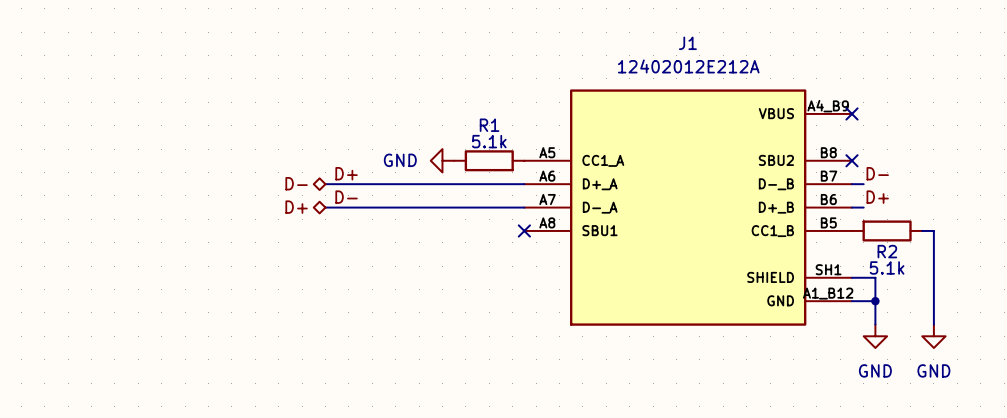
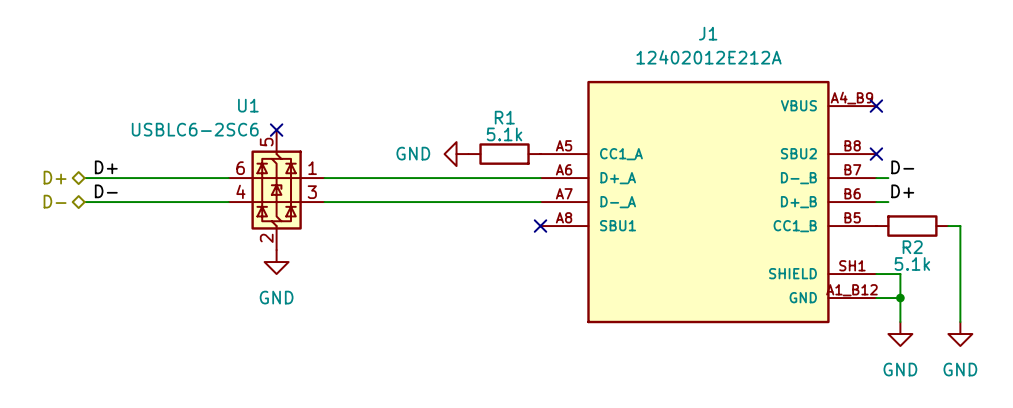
no-connect mark: none -> (276, 130)
label: none -> D+ (106, 167)
label: D+ (346, 173) -> none
hierarchical label: none -> D+ (55, 177)
hierarchical label: D- (296, 183) -> none
wire: none -> (84, 178) (228, 178)
wire: none -> (324, 178) (336, 178)
U1: none -> USBLC6-2SC6 (276, 190)
label: none -> D- (106, 191)
label: D- (346, 197) -> none
hierarchical label: none -> D- (55, 201)
wire: none -> (84, 202) (228, 202)
hierarchical label: D+ (296, 207) -> none
wire: none -> (324, 202) (336, 202)
power symbol: none -> GND (276, 262)

